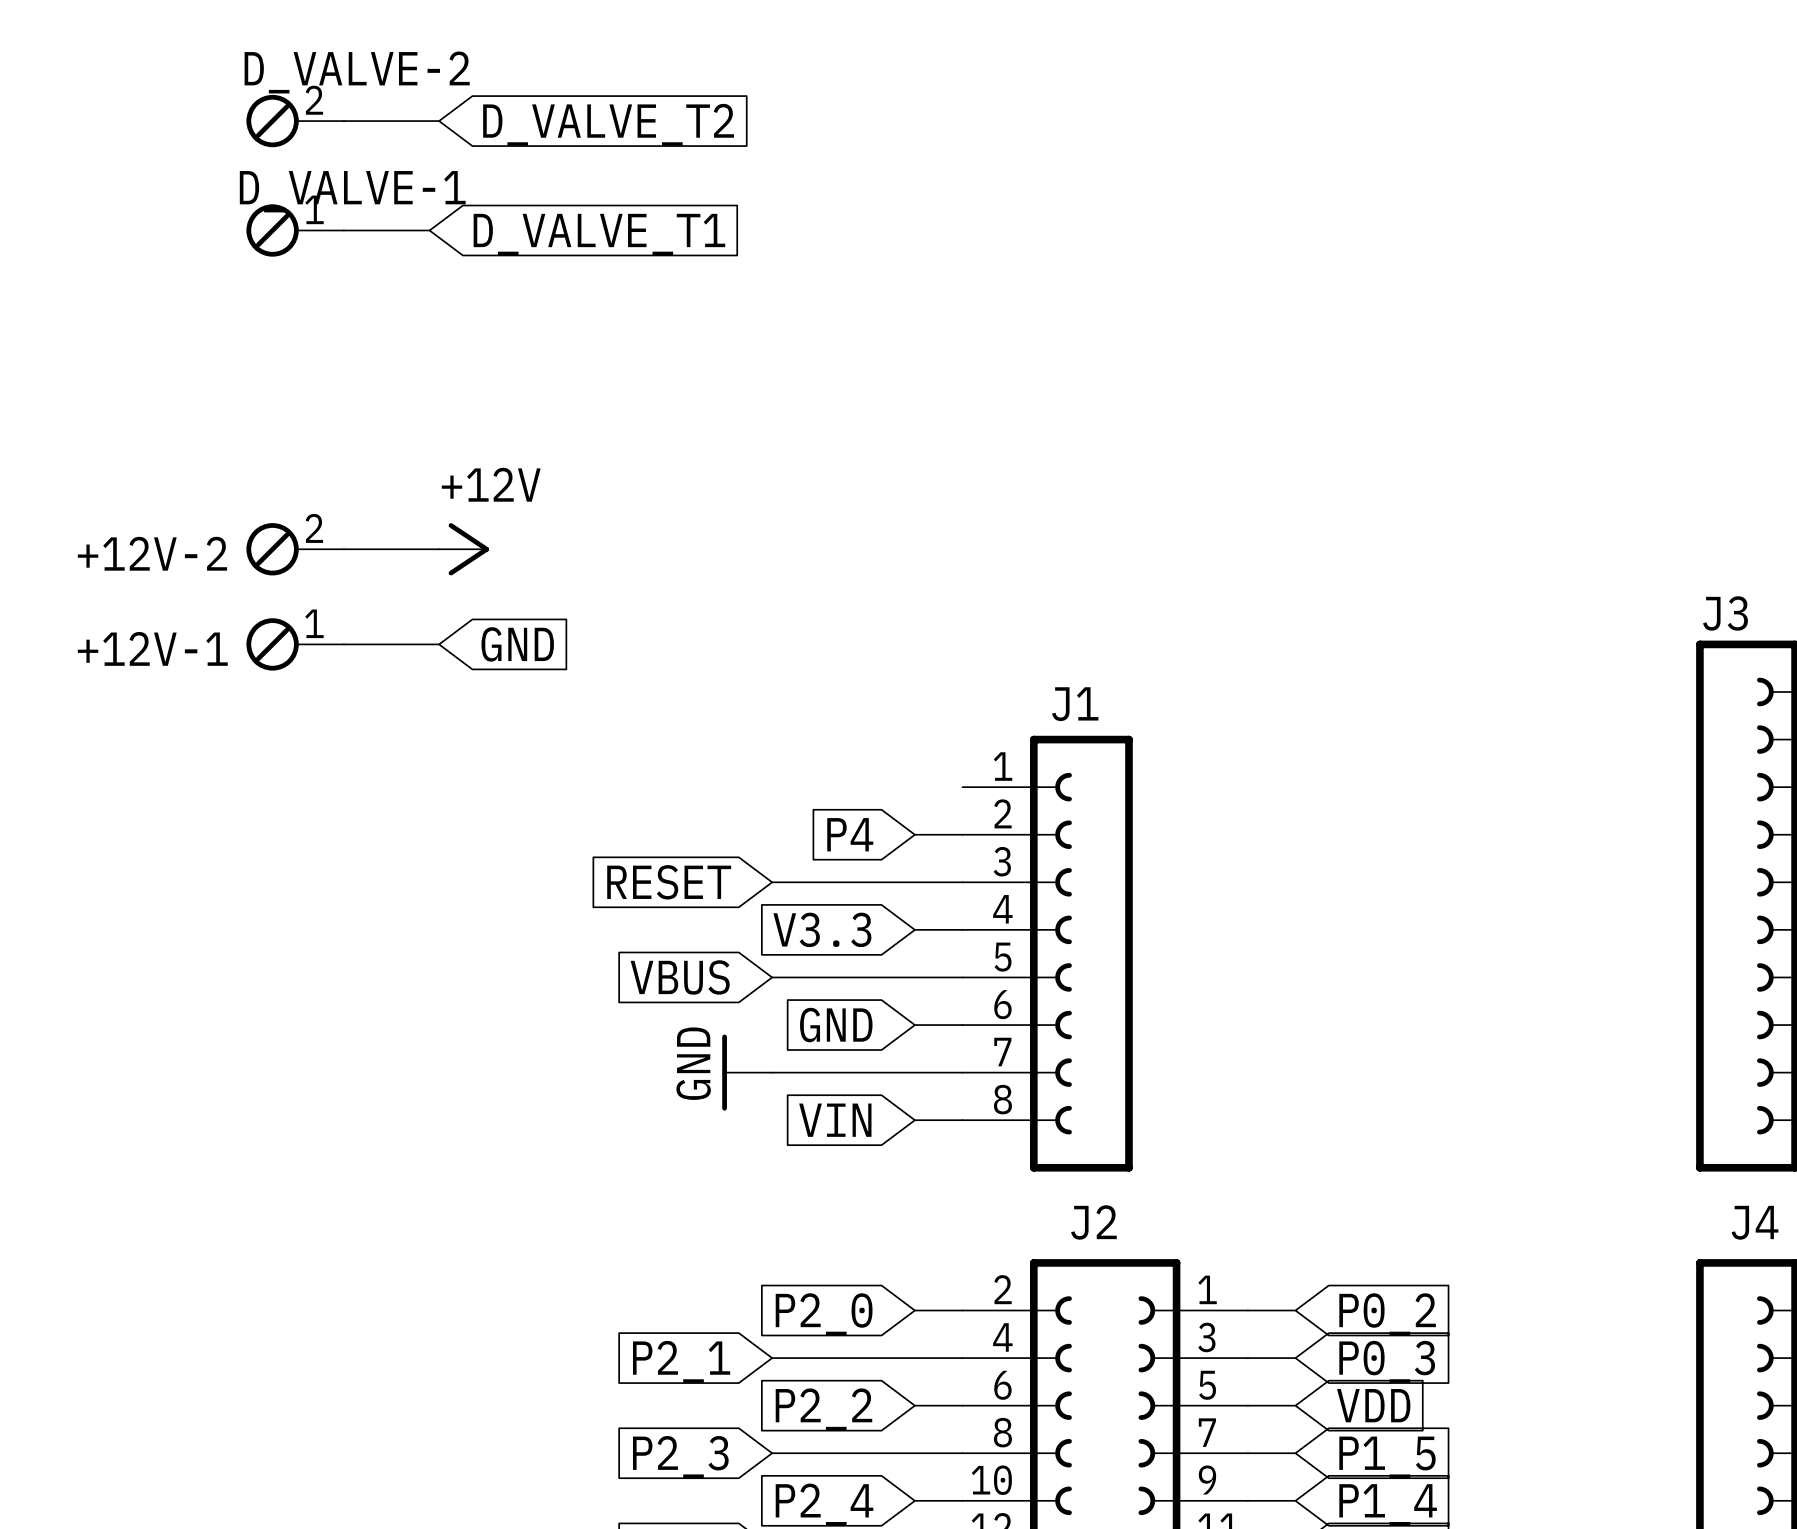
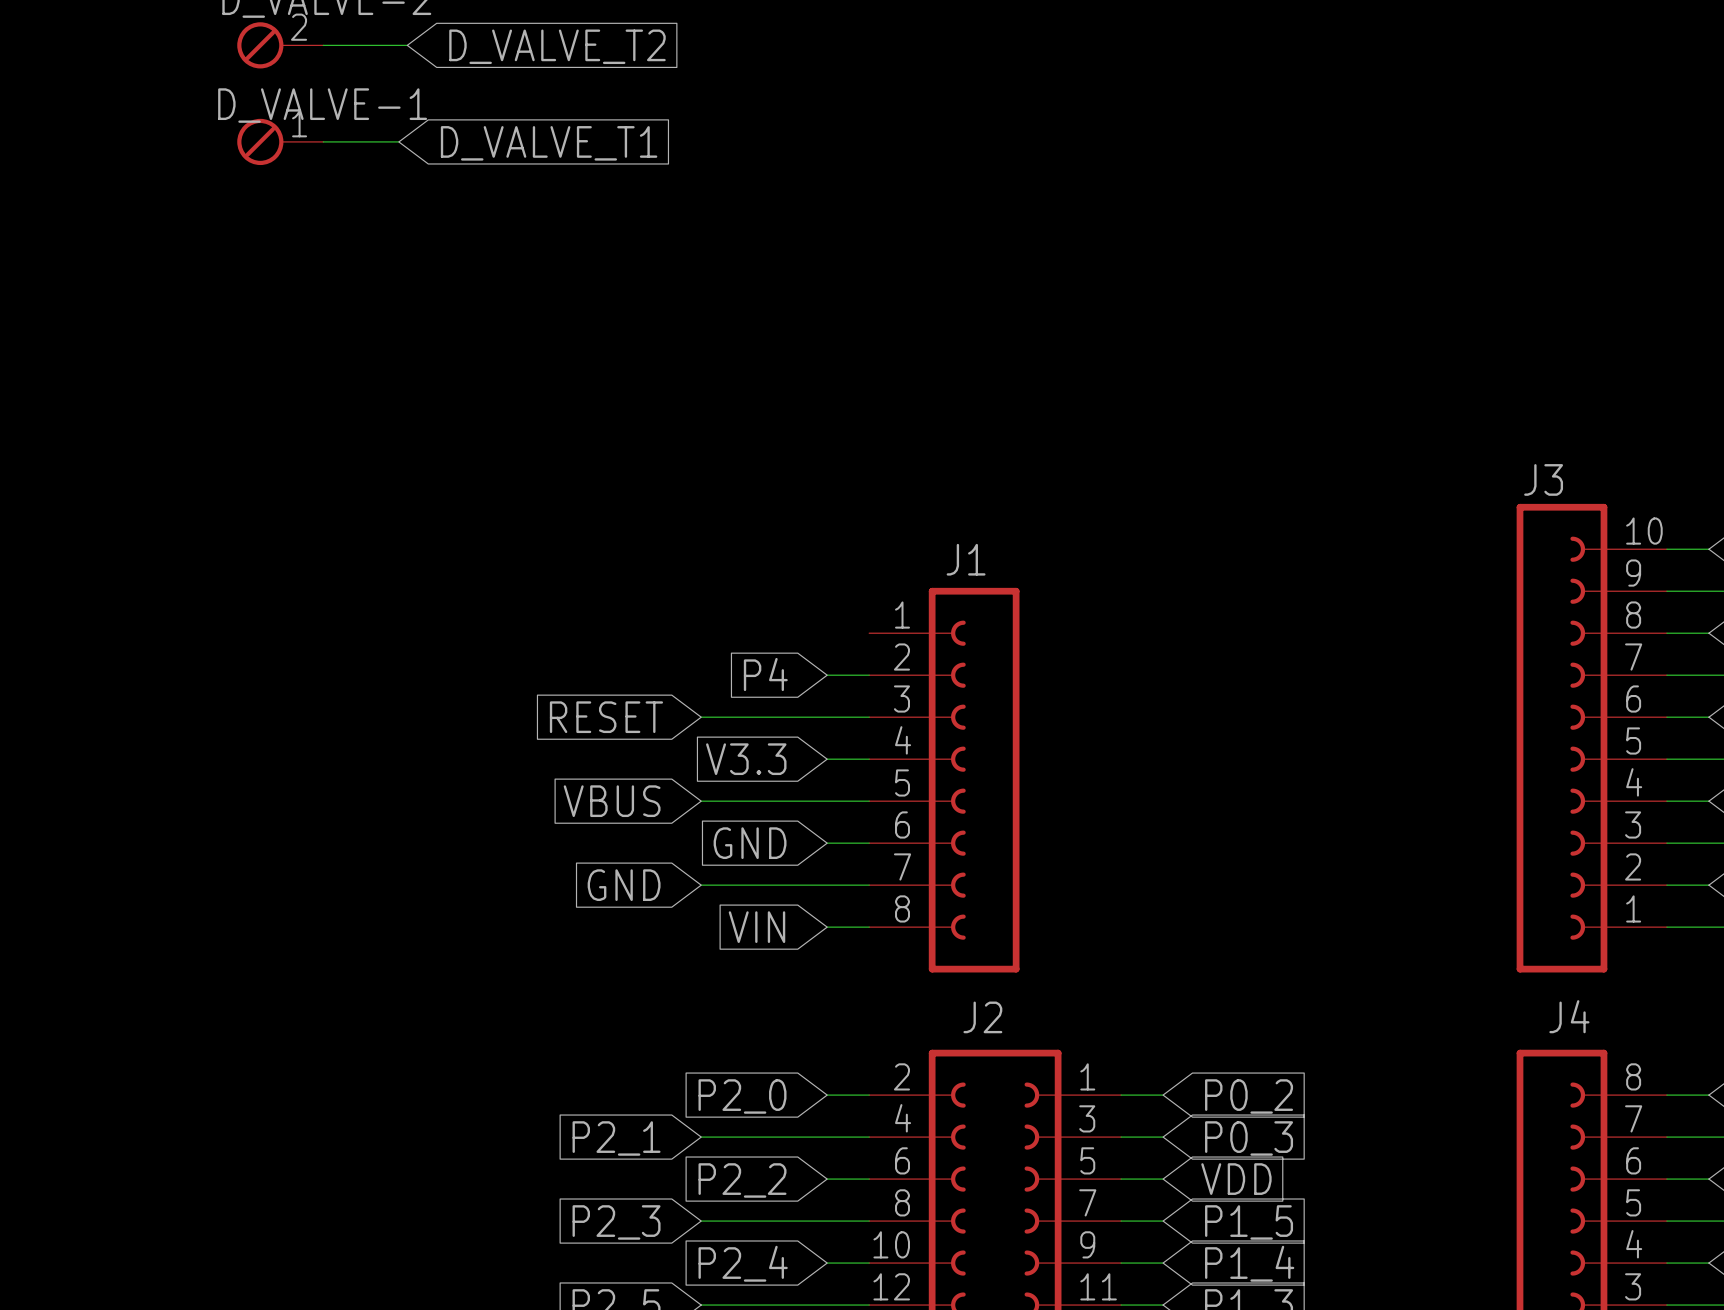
+12V-2: (295, 549) -> none
wire: (343, 549) (439, 549) -> none
power symbol: +12V (464, 549) -> none
+12V-1: (295, 644) -> none
wire: (343, 644) (439, 644) -> none
global label: GND (517, 644) -> none
global label: none -> GND (624, 885)
power symbol: GND (747, 1072) -> none

